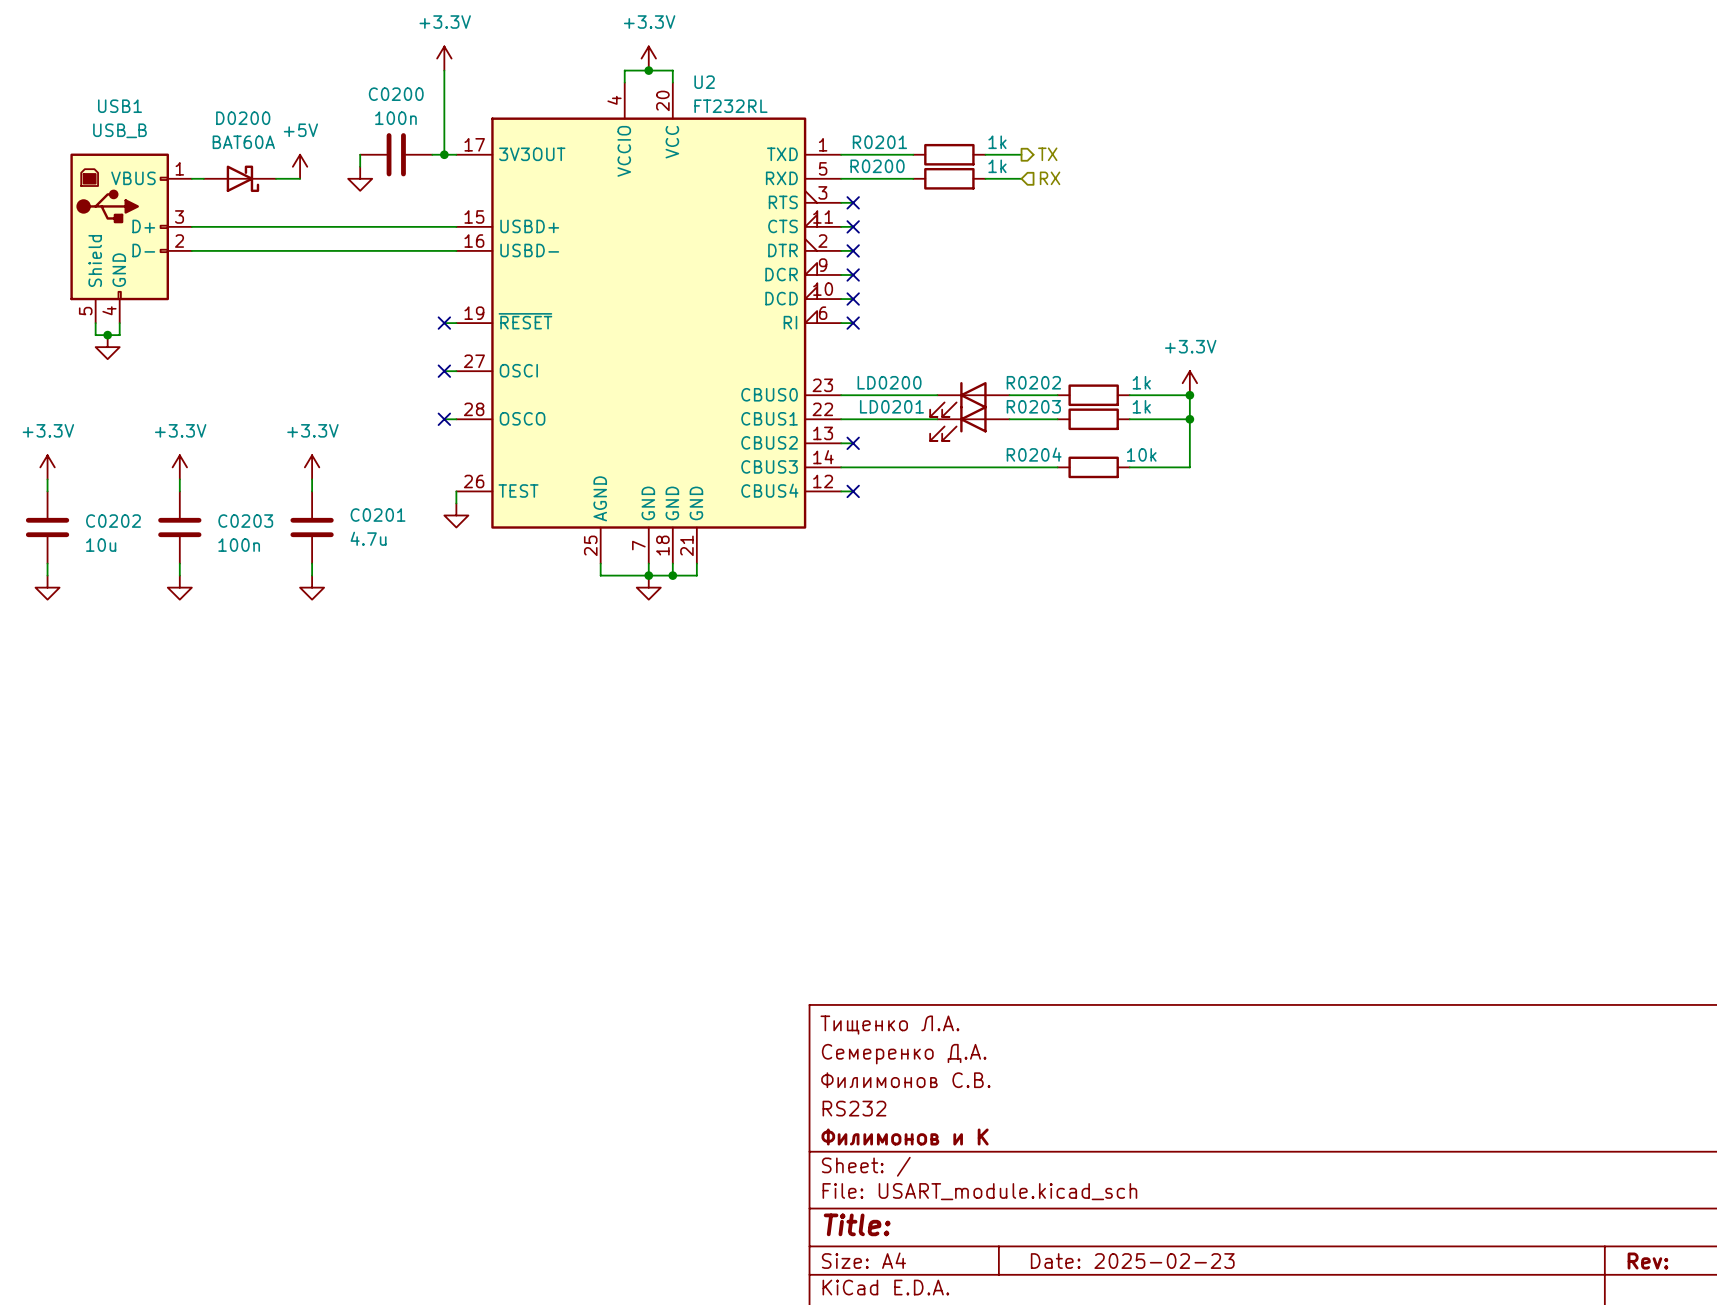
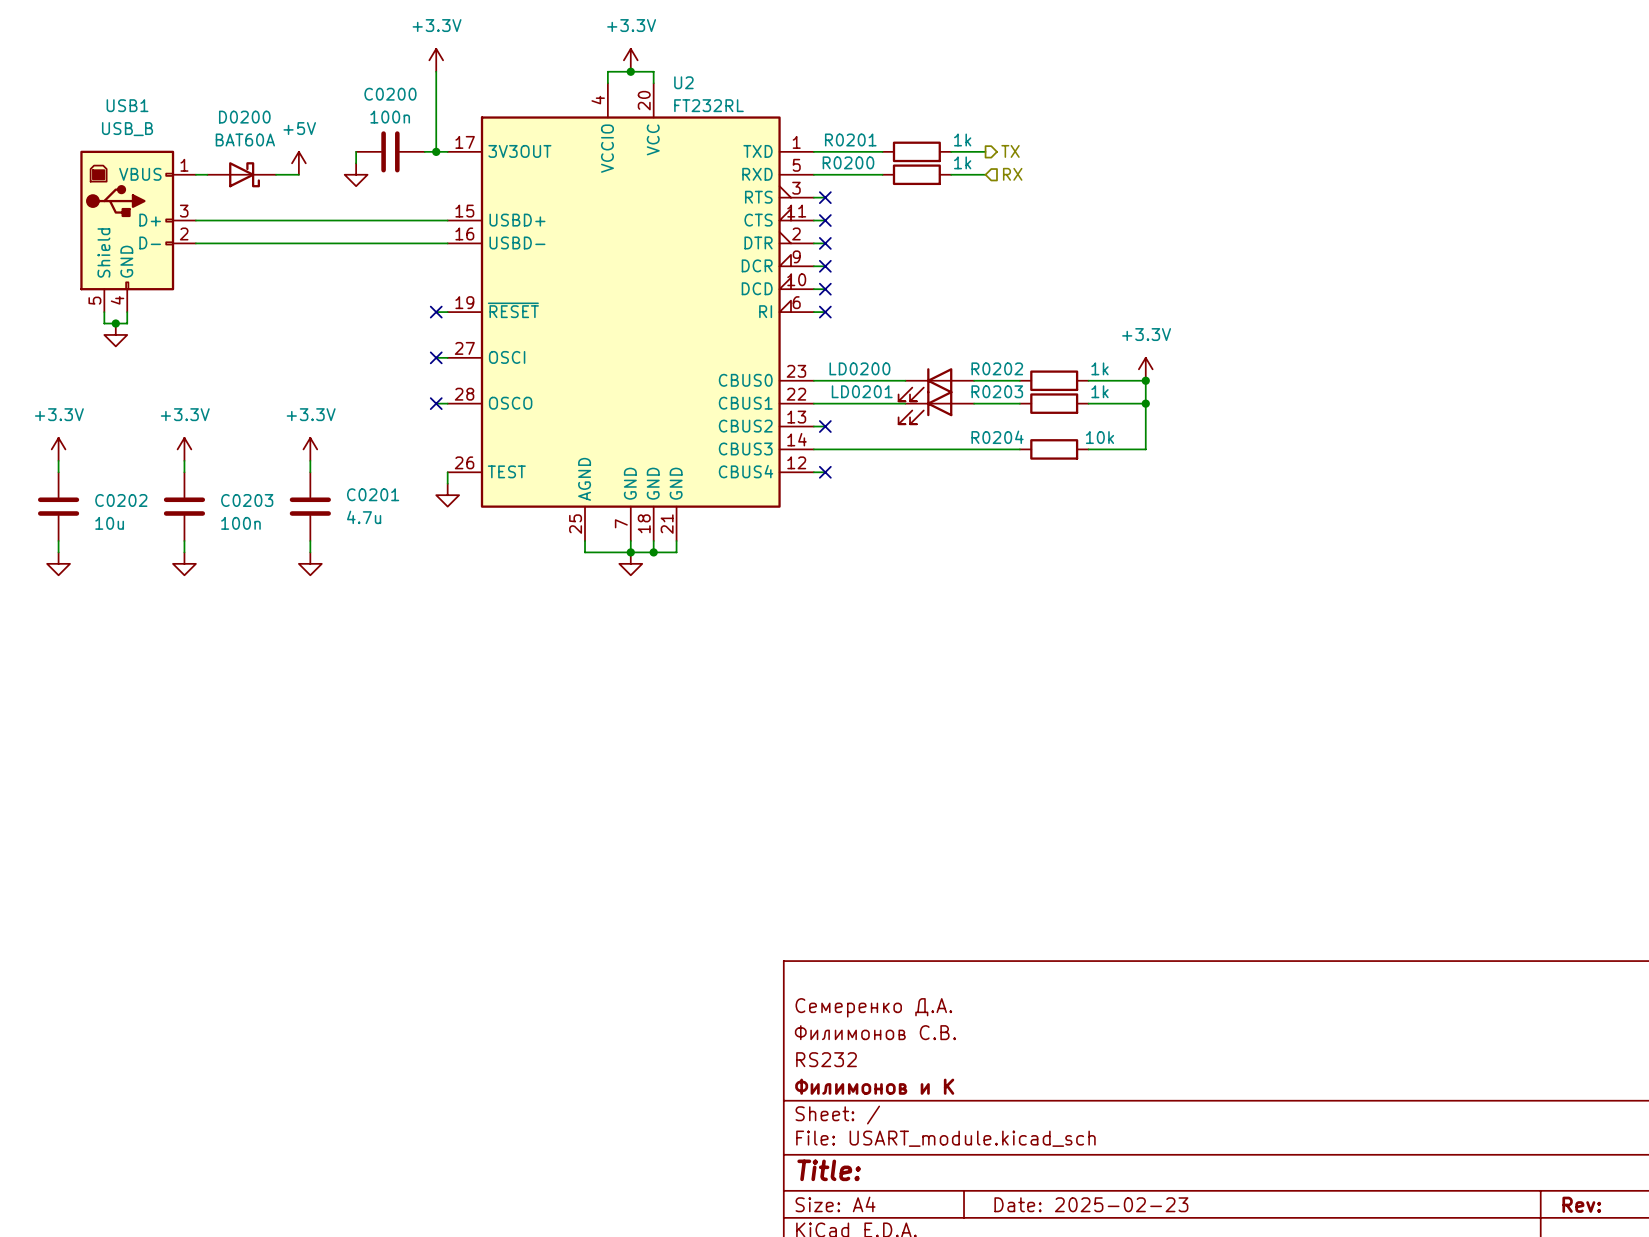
title block: Тищенко Л.А. (889, 1025) -> none

